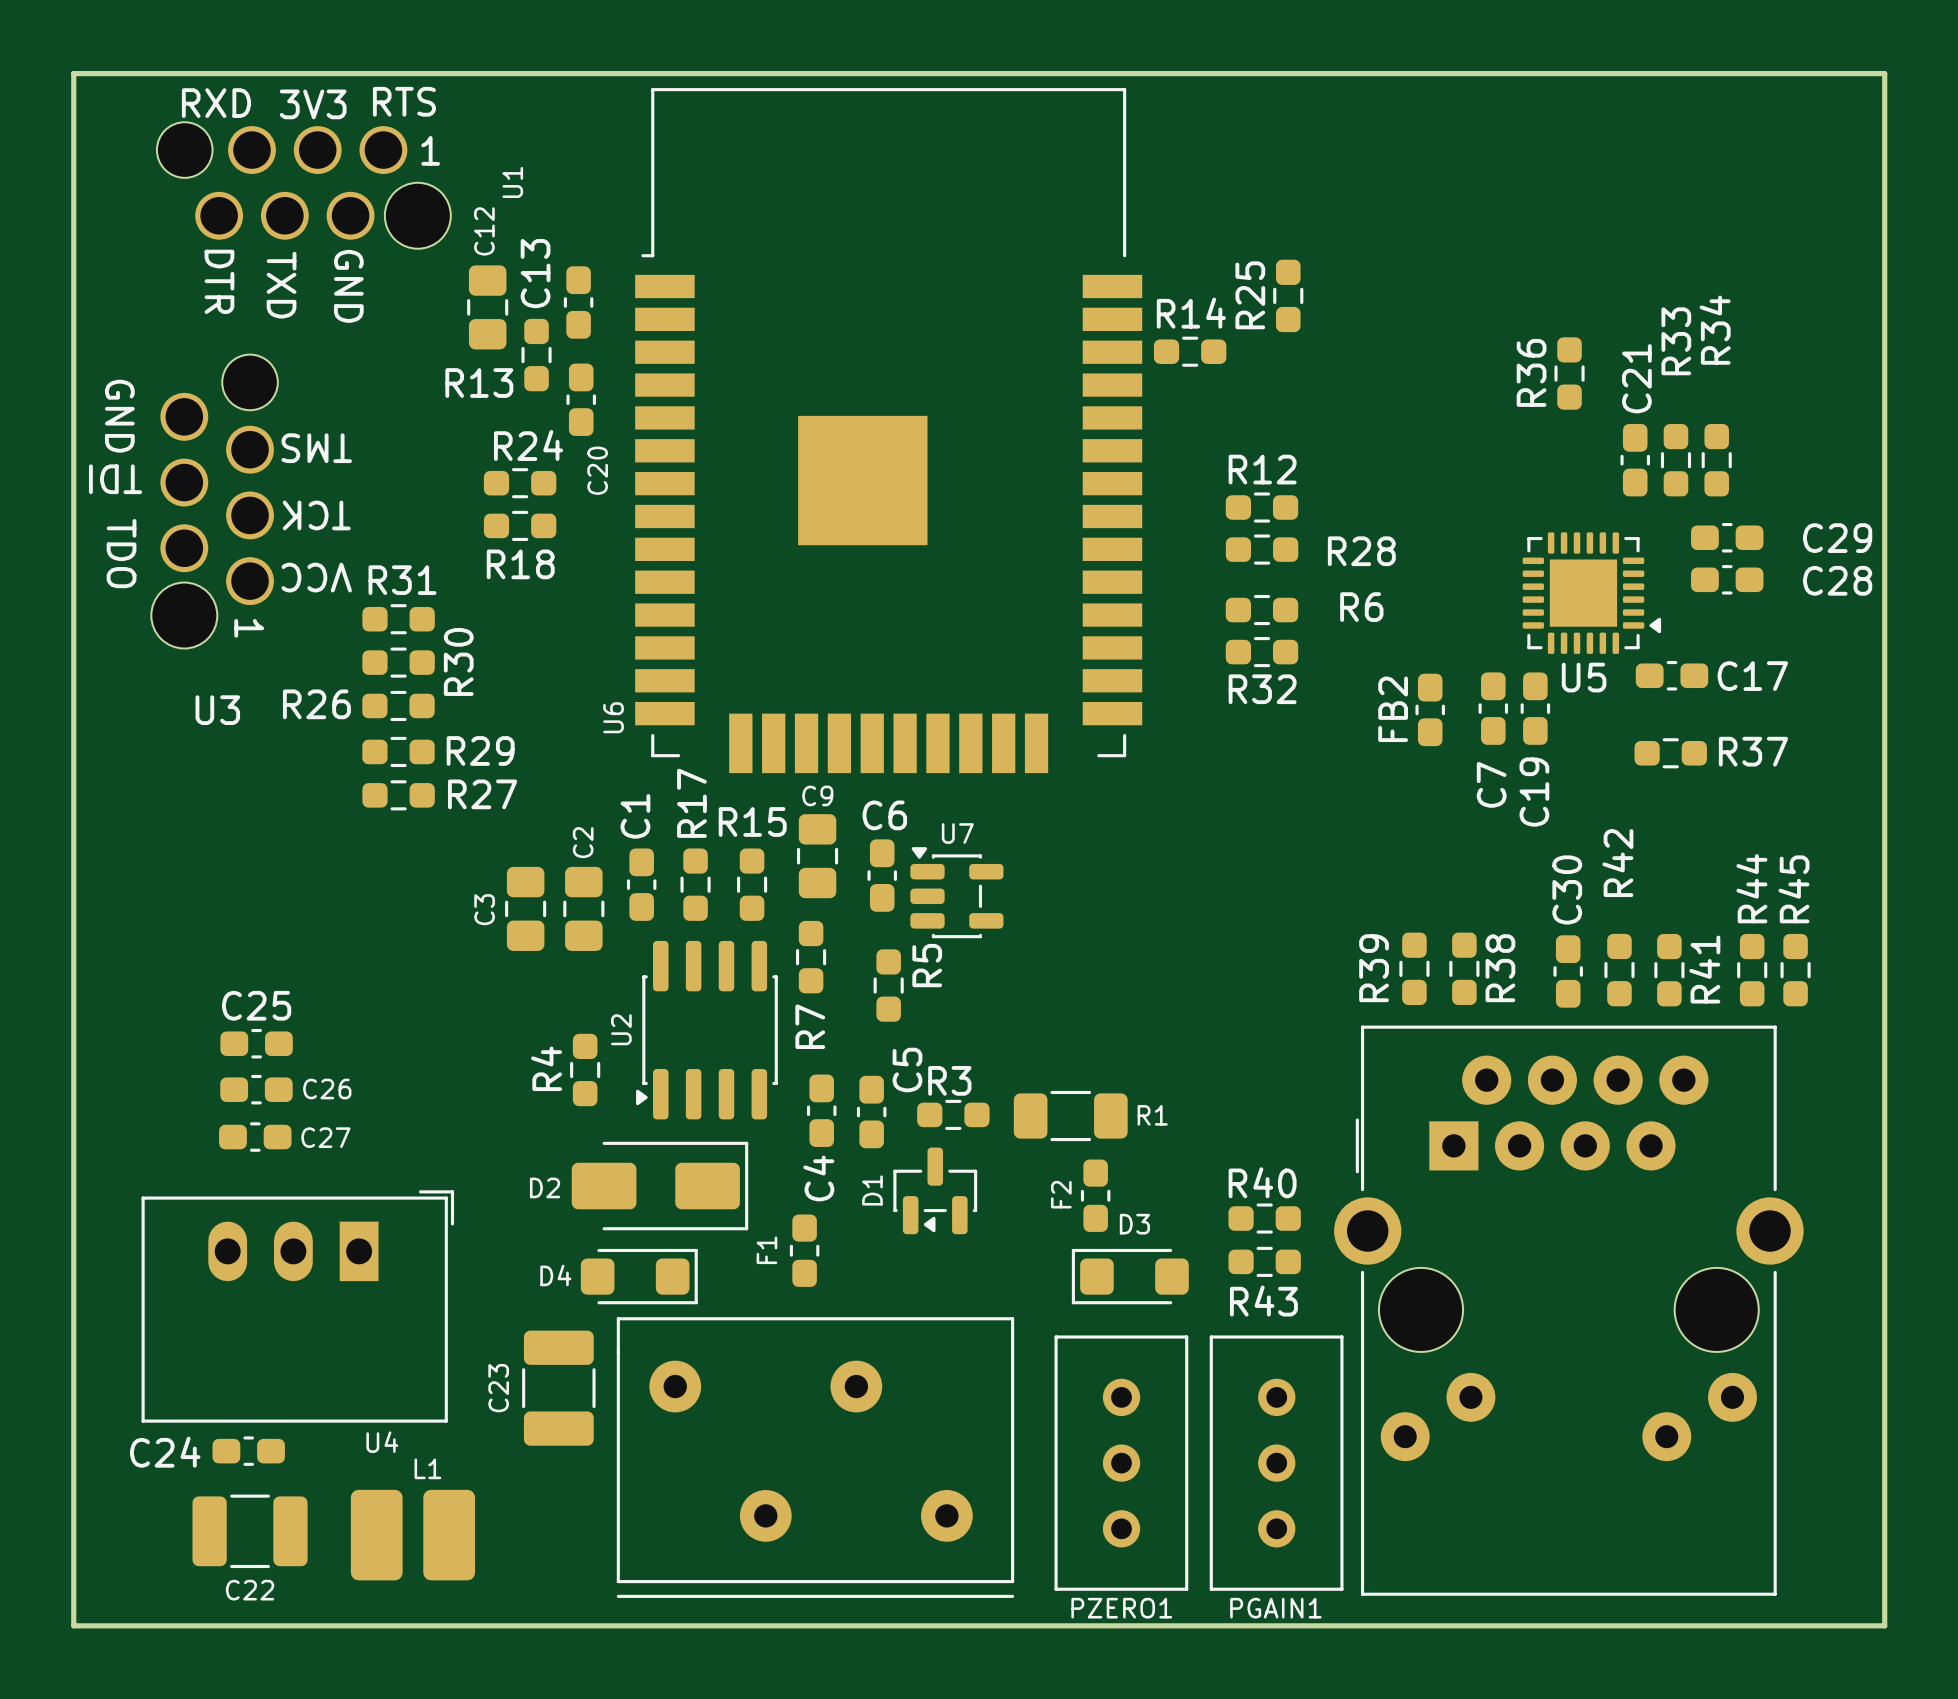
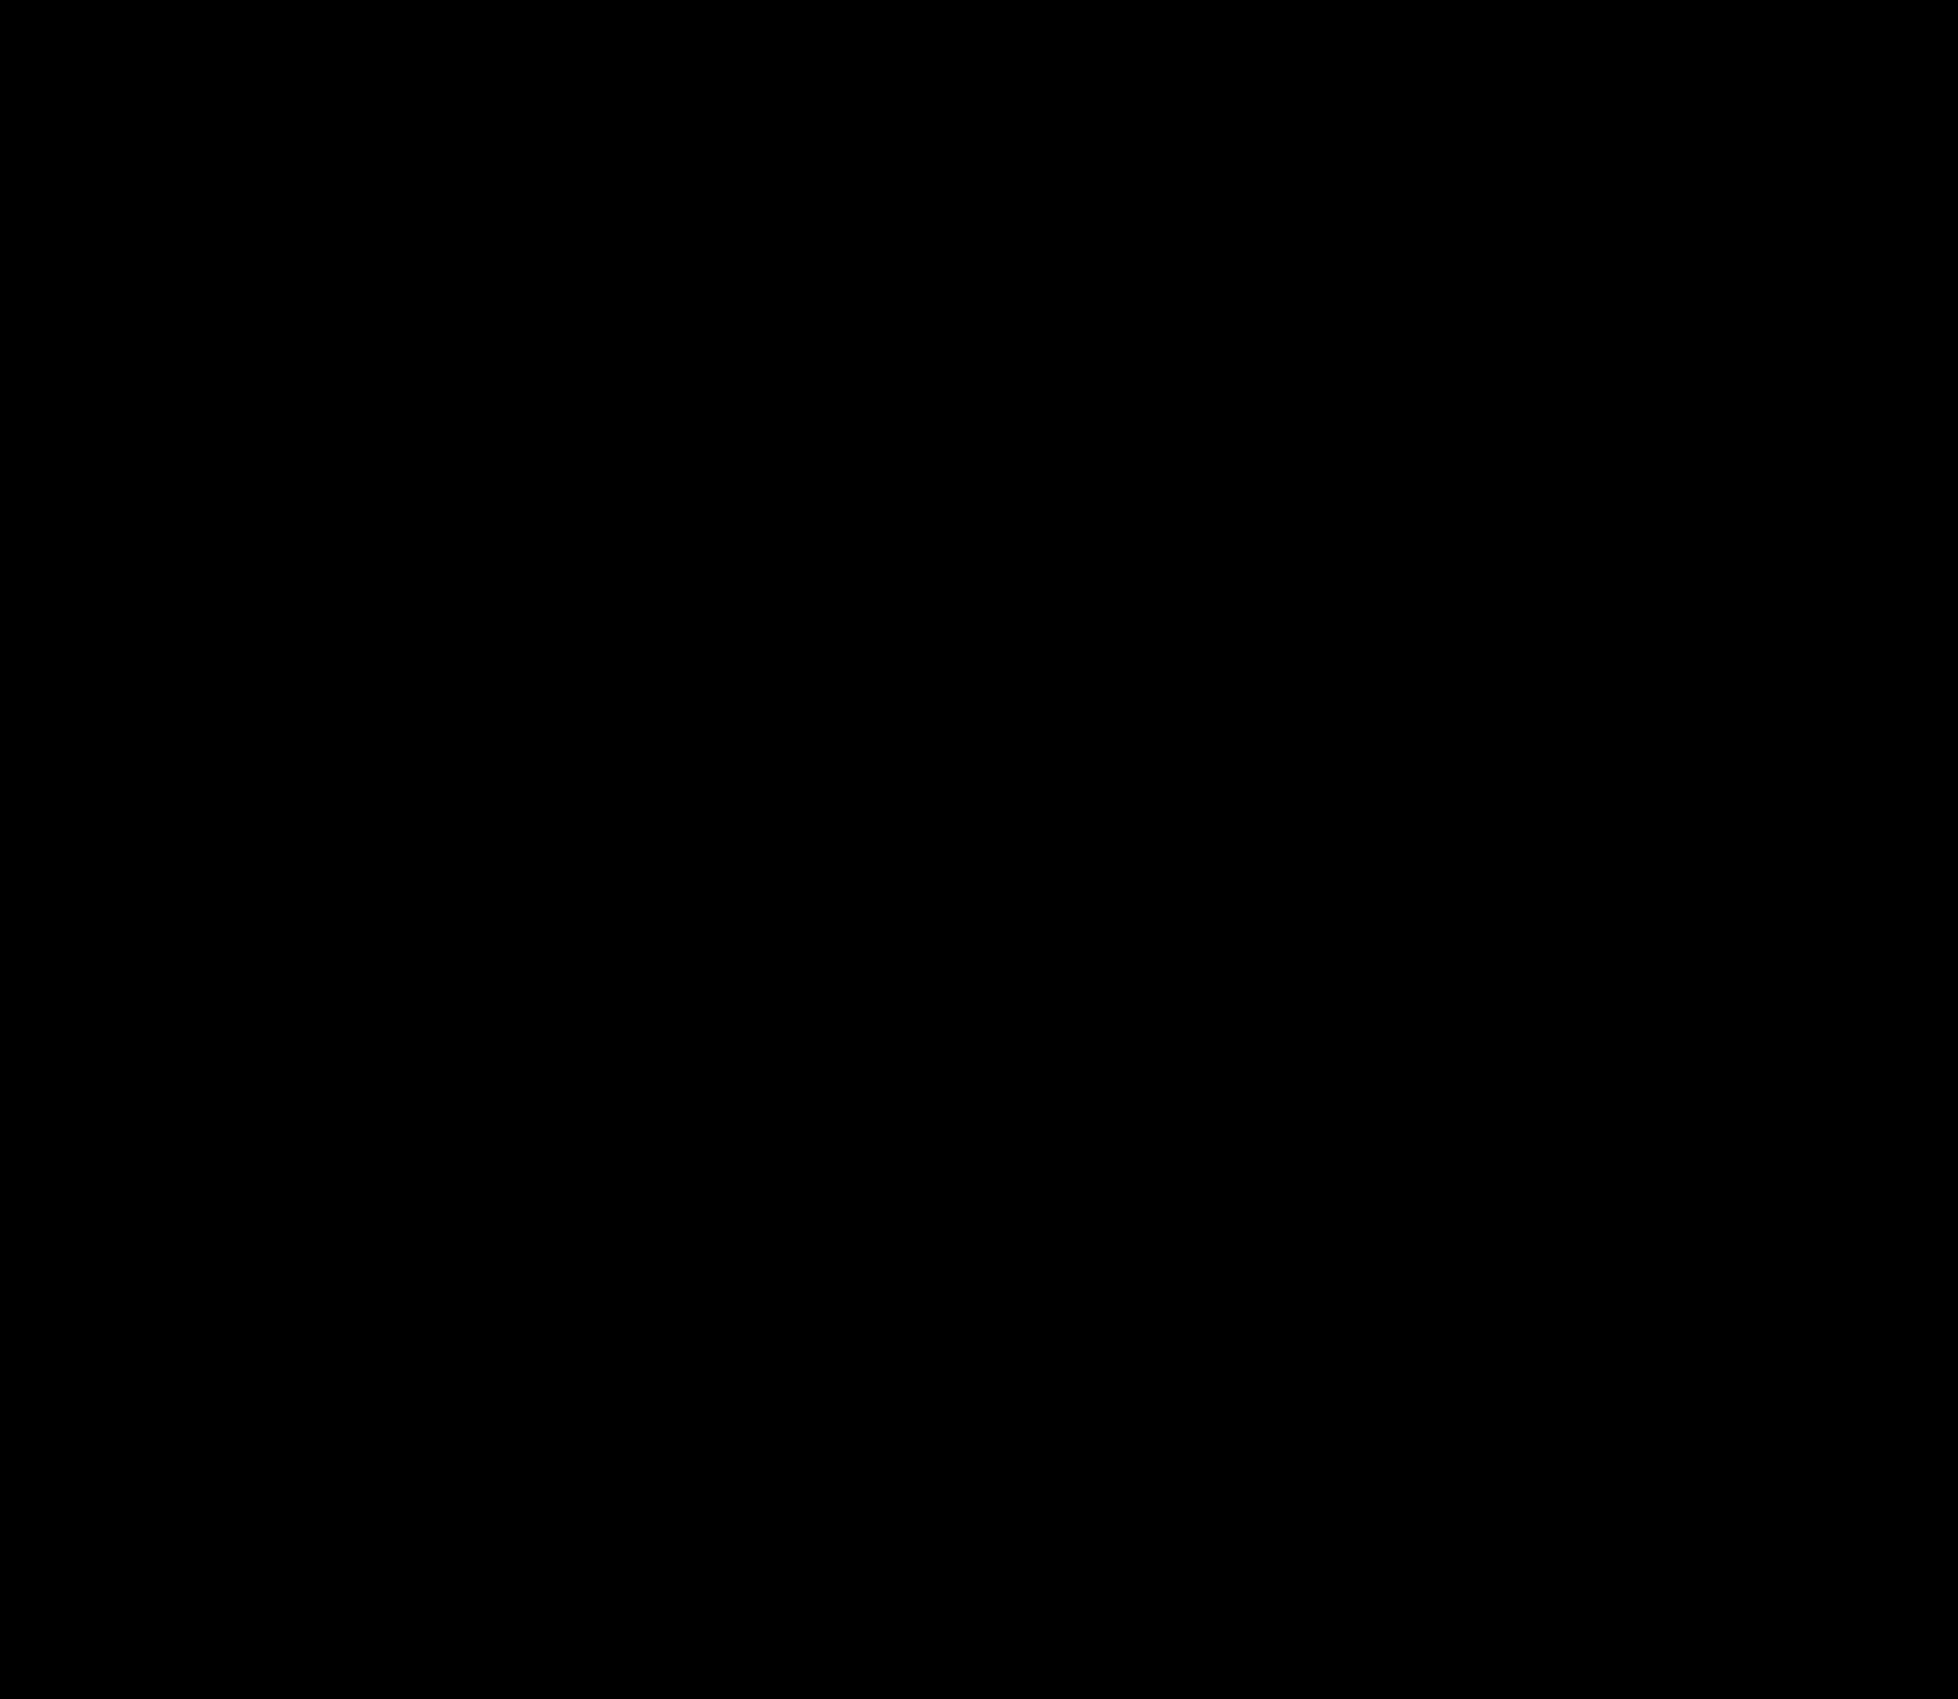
board edge: (73, 73) (1884, 73) (1884, 1625) (73, 1625) (73, 73) -> none
U1: (303, 185) -> none
R25: (1288, 295) -> none
C13: (578, 302) -> none
C12: (487, 307) -> none
R14: (1190, 351) -> none
R13: (536, 355) -> none
R36: (1569, 373) -> none
C20: (581, 399) -> none
U6: (888, 430) -> none
C21: (1635, 460) -> none
R33: (1675, 460) -> none
R34: (1716, 460) -> none
R24: (520, 483) -> none
U3: (214, 501) -> none
R12: (1261, 507) -> none
R18: (520, 525) -> none
C29: (1727, 537) -> none
R28: (1262, 549) -> none
C28: (1727, 579) -> none
U5: (1591, 593) -> none
R6: (1261, 610) -> none
R31: (398, 619) -> none
R32: (1261, 652) -> none
R30: (398, 662) -> none
C17: (1672, 675) -> none
R26: (398, 705) -> none
C7: (1493, 708) -> none
C19: (1535, 708) -> none
FB2: (1430, 709) -> none
R29: (398, 751) -> none
R37: (1670, 753) -> none
R27: (398, 795) -> none
C9: (817, 856) -> none
C6: (882, 875) -> none
C1: (641, 884) -> none
R17: (695, 884) -> none
R15: (752, 884) -> none
U7: (956, 892) -> none
C3: (525, 908) -> none
C2: (583, 908) -> none
R7: (811, 957) -> none
R39: (1414, 968) -> none
R38: (1464, 968) -> none
R42: (1619, 970) -> none
R41: (1669, 970) -> none
R44: (1752, 970) -> none
R45: (1795, 970) -> none
C30: (1568, 971) -> none
R5: (888, 985) -> none
U2: (706, 1030) -> none
C25: (256, 1043) -> none
R4: (585, 1070) -> none
C26: (256, 1089) -> none
C4: (821, 1110) -> none
C5: (871, 1112) -> none
R3: (953, 1114) -> none
R1: (1070, 1116) -> none
C27: (255, 1137) -> none
D2: (659, 1186) -> none
D1: (935, 1190) -> none
F2: (1095, 1195) -> none
R40: (1264, 1218) -> none
F1: (804, 1250) -> none
R43: (1264, 1261) -> none
D4: (639, 1276) -> none
D3: (1130, 1276) -> none
U4: (297, 1306) -> none
part: (1568, 1310) -> none
C23: (558, 1388) -> none
C24: (248, 1451) -> none
part: (815, 1457) -> none
PZERO1: (1121, 1463) -> none
PGAIN1: (1276, 1463) -> none
C22: (250, 1531) -> none
L1: (412, 1535) -> none

